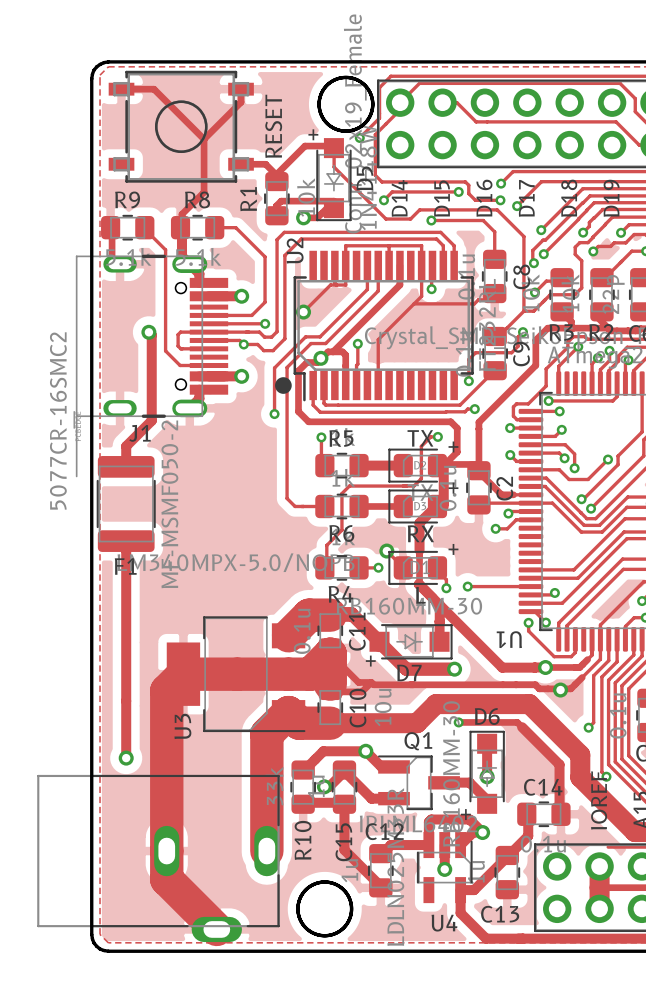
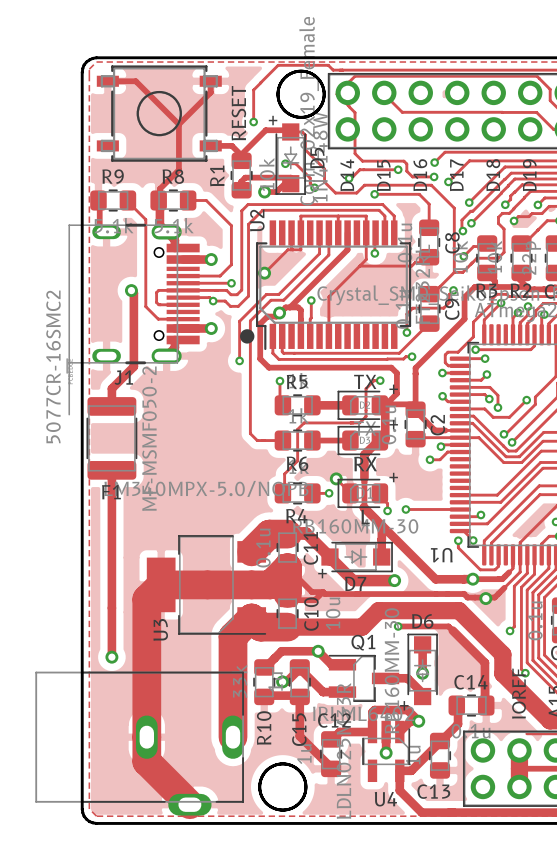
track: (390, 76) (379, 87) (379, 118) (359, 137) -> (339, 70) (333, 70) (328, 65) (278, 65) (260, 82)
track: (419, 83) (400, 102) (400, 109) (375, 134) (375, 175) (382, 181) (417, 181) -> (364, 76) (355, 76) (337, 94) (355, 112) (355, 153) (362, 161)
track: none -> (260, 82) (253, 90) (253, 122)
track: (442, 102) (456, 102) (476, 121) (616, 121) (619, 125) -> (502, 112) (536, 112)
track: none -> (384, 94) (402, 112) (502, 112)
via: none -> (253, 122)
via: (359, 137) -> none
track: (334, 146) (334, 167) (373, 206) -> (290, 131) (302, 131) (305, 135) (305, 149) (324, 169) (324, 182)
track: none -> (285, 163) (295, 163) (310, 178) (310, 183) (314, 187)
via: none -> (285, 163)
track: (414, 191) (392, 191) (383, 200) -> (359, 169) (351, 178)
via: (383, 200) -> none
via: none -> (349, 178)
via: none -> (314, 187)

